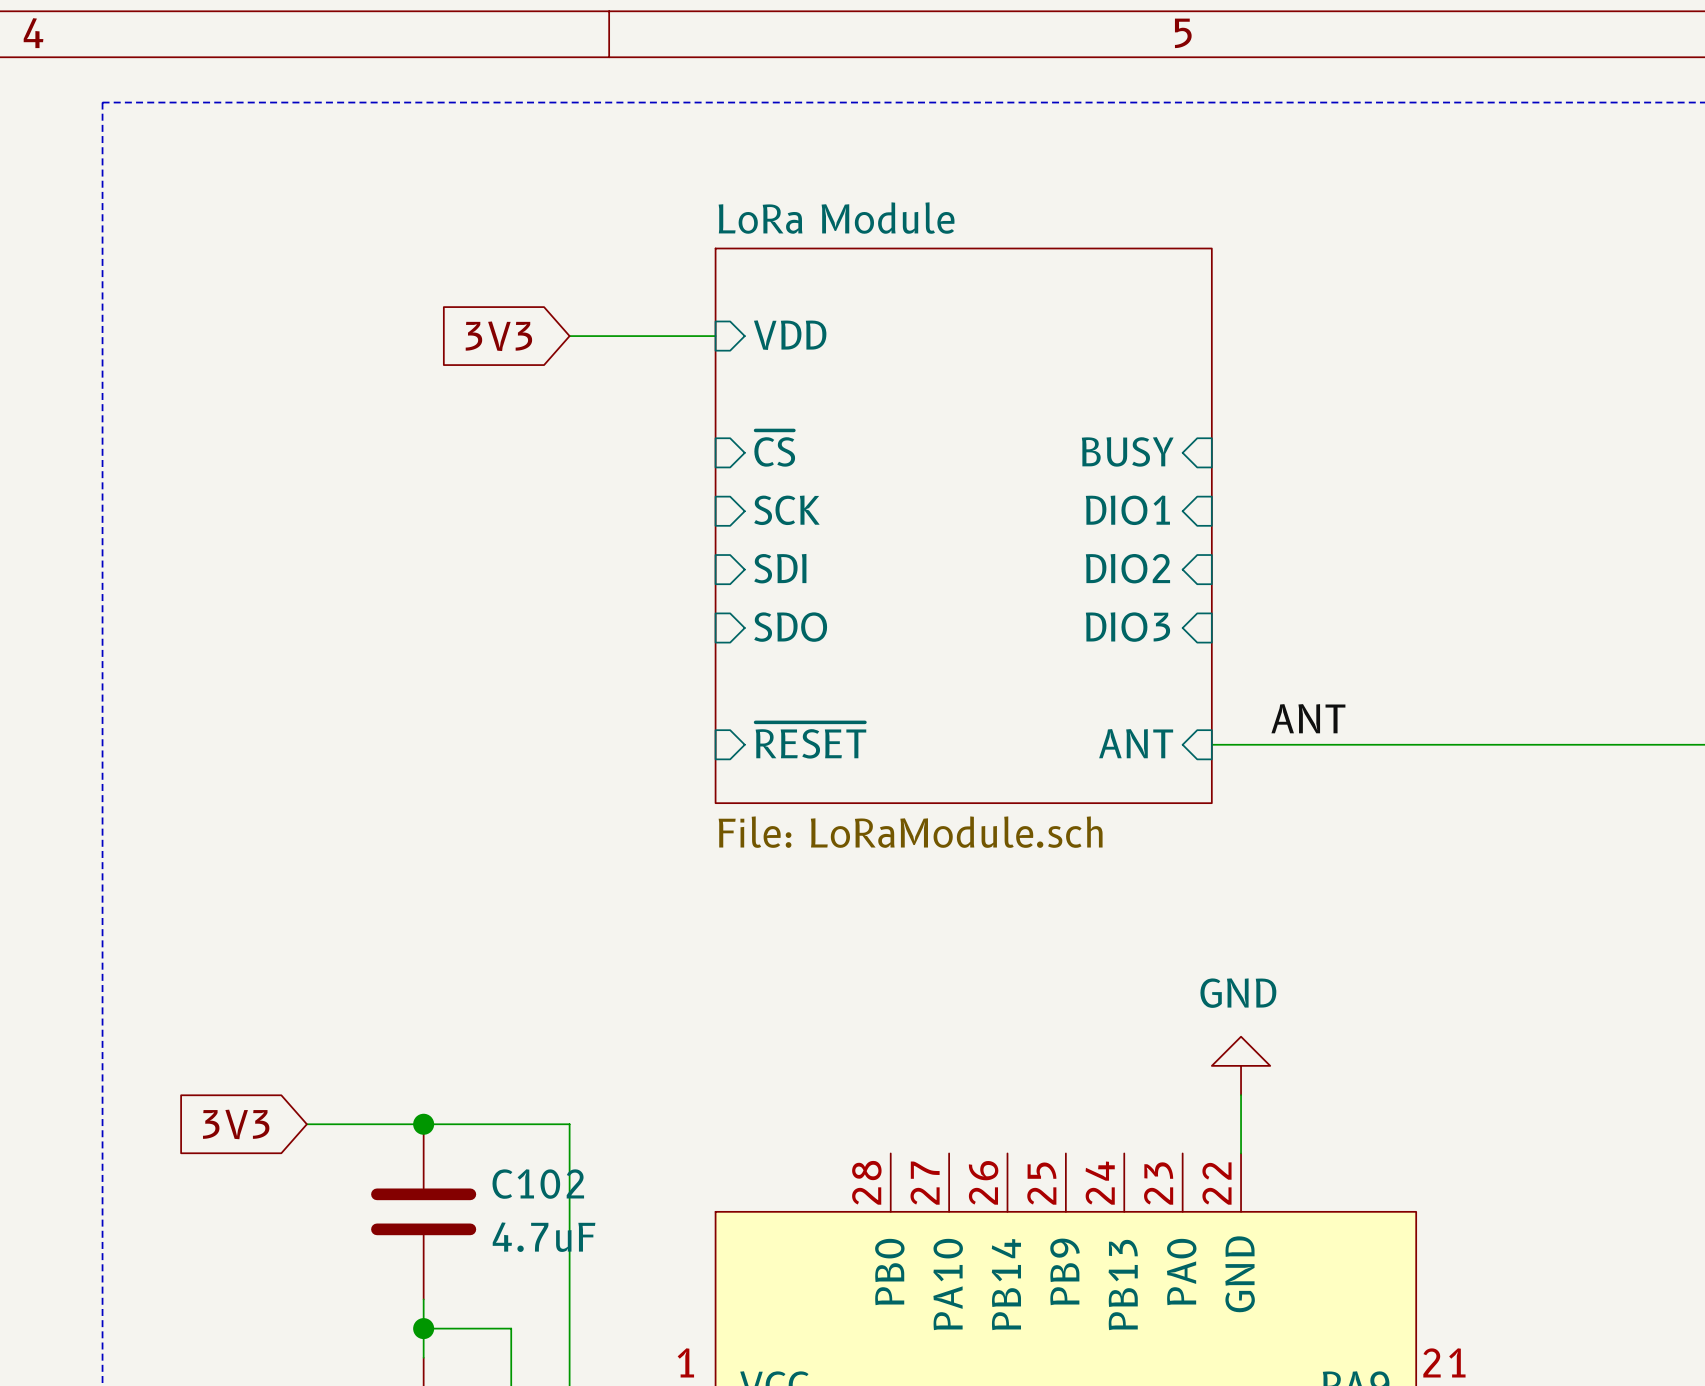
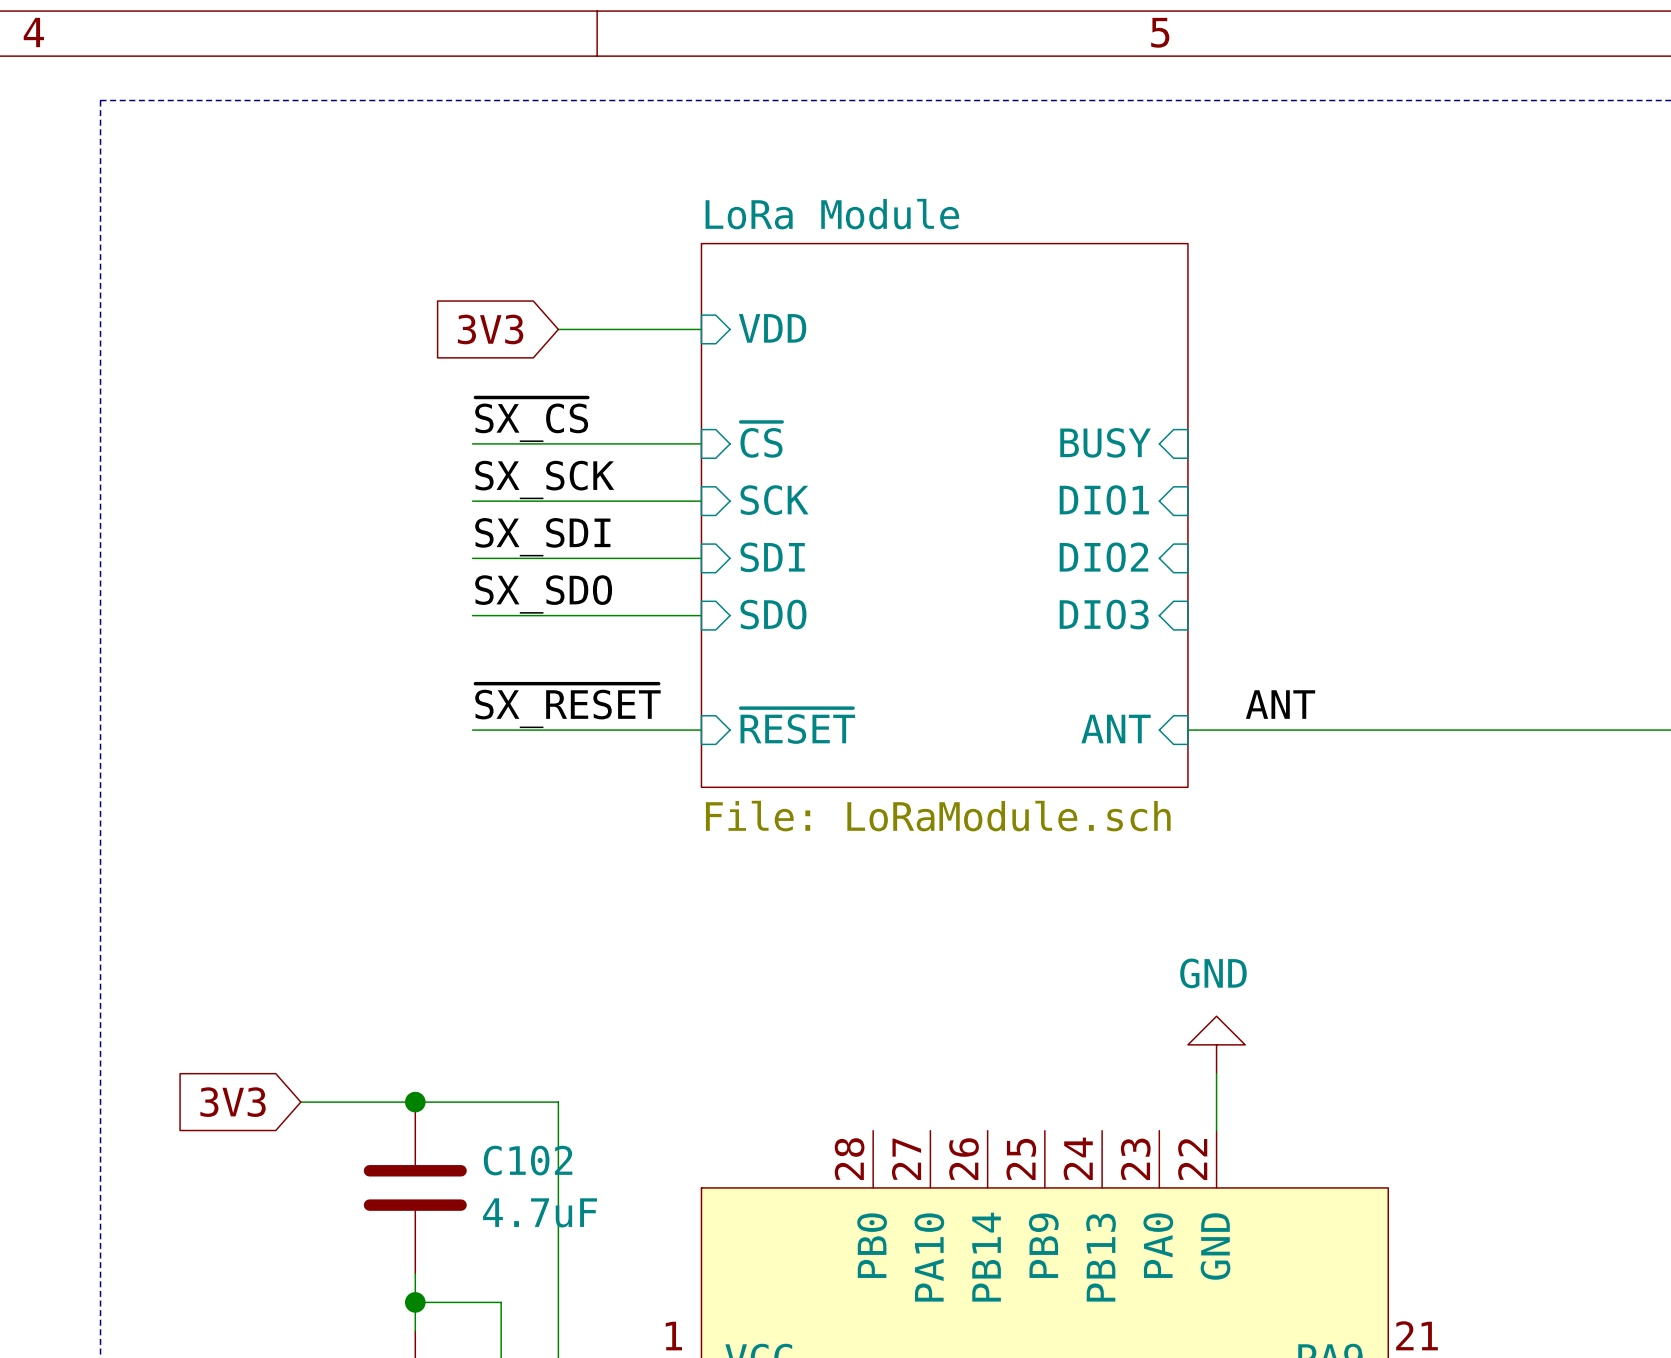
label: none -> ~{SX_CS} (531, 419)
wire: none -> (472, 443) (701, 443)
label: none -> SX_SCK (544, 479)
wire: none -> (472, 501) (701, 501)
label: none -> SX_SDI (542, 537)
wire: none -> (472, 558) (701, 558)
label: none -> SX_SDO (543, 594)
wire: none -> (472, 615) (701, 615)
label: none -> ~{SX_RESET} (567, 705)
wire: none -> (472, 730) (701, 730)

